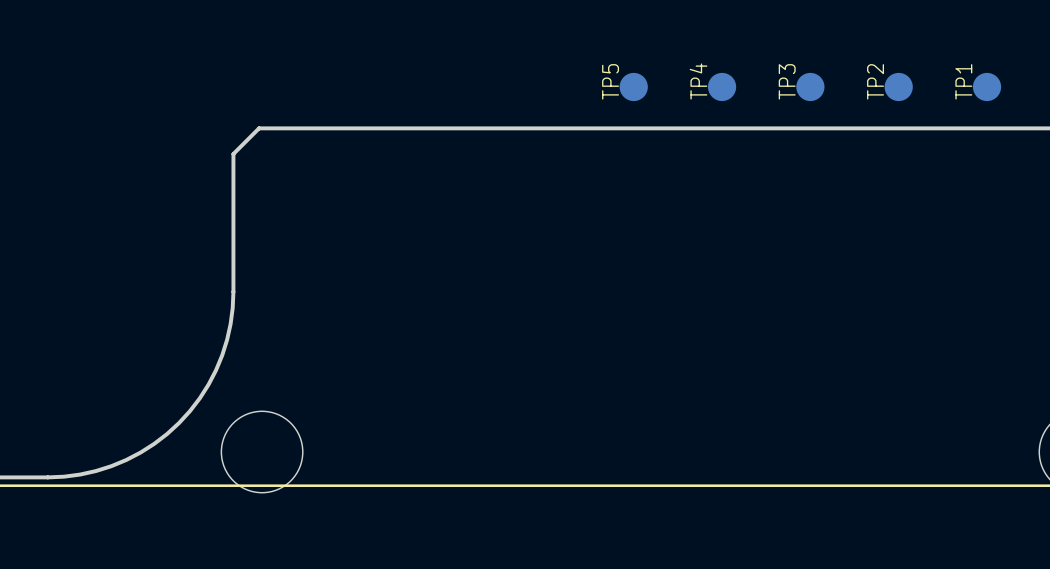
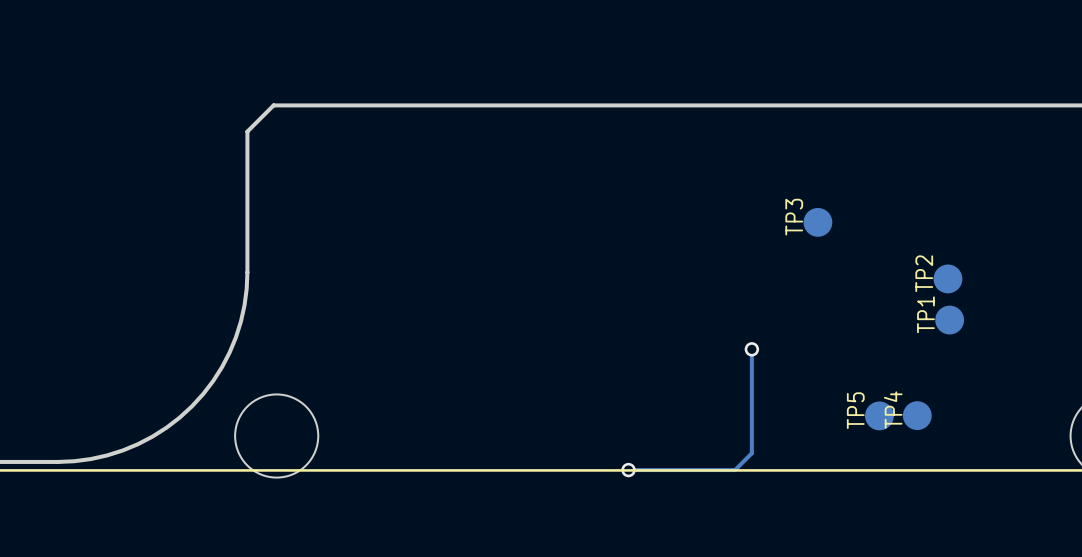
TP5 position: (633, 86) -> (879, 415)
TP4 position: (722, 86) -> (917, 415)
TP3 position: (810, 86) -> (817, 222)
TP2 position: (898, 86) -> (947, 278)
TP1 position: (987, 86) -> (949, 320)
track: none -> (751, 349) (751, 453) (735, 470) (628, 470)
via: none -> (751, 349)
via: none -> (628, 470)

